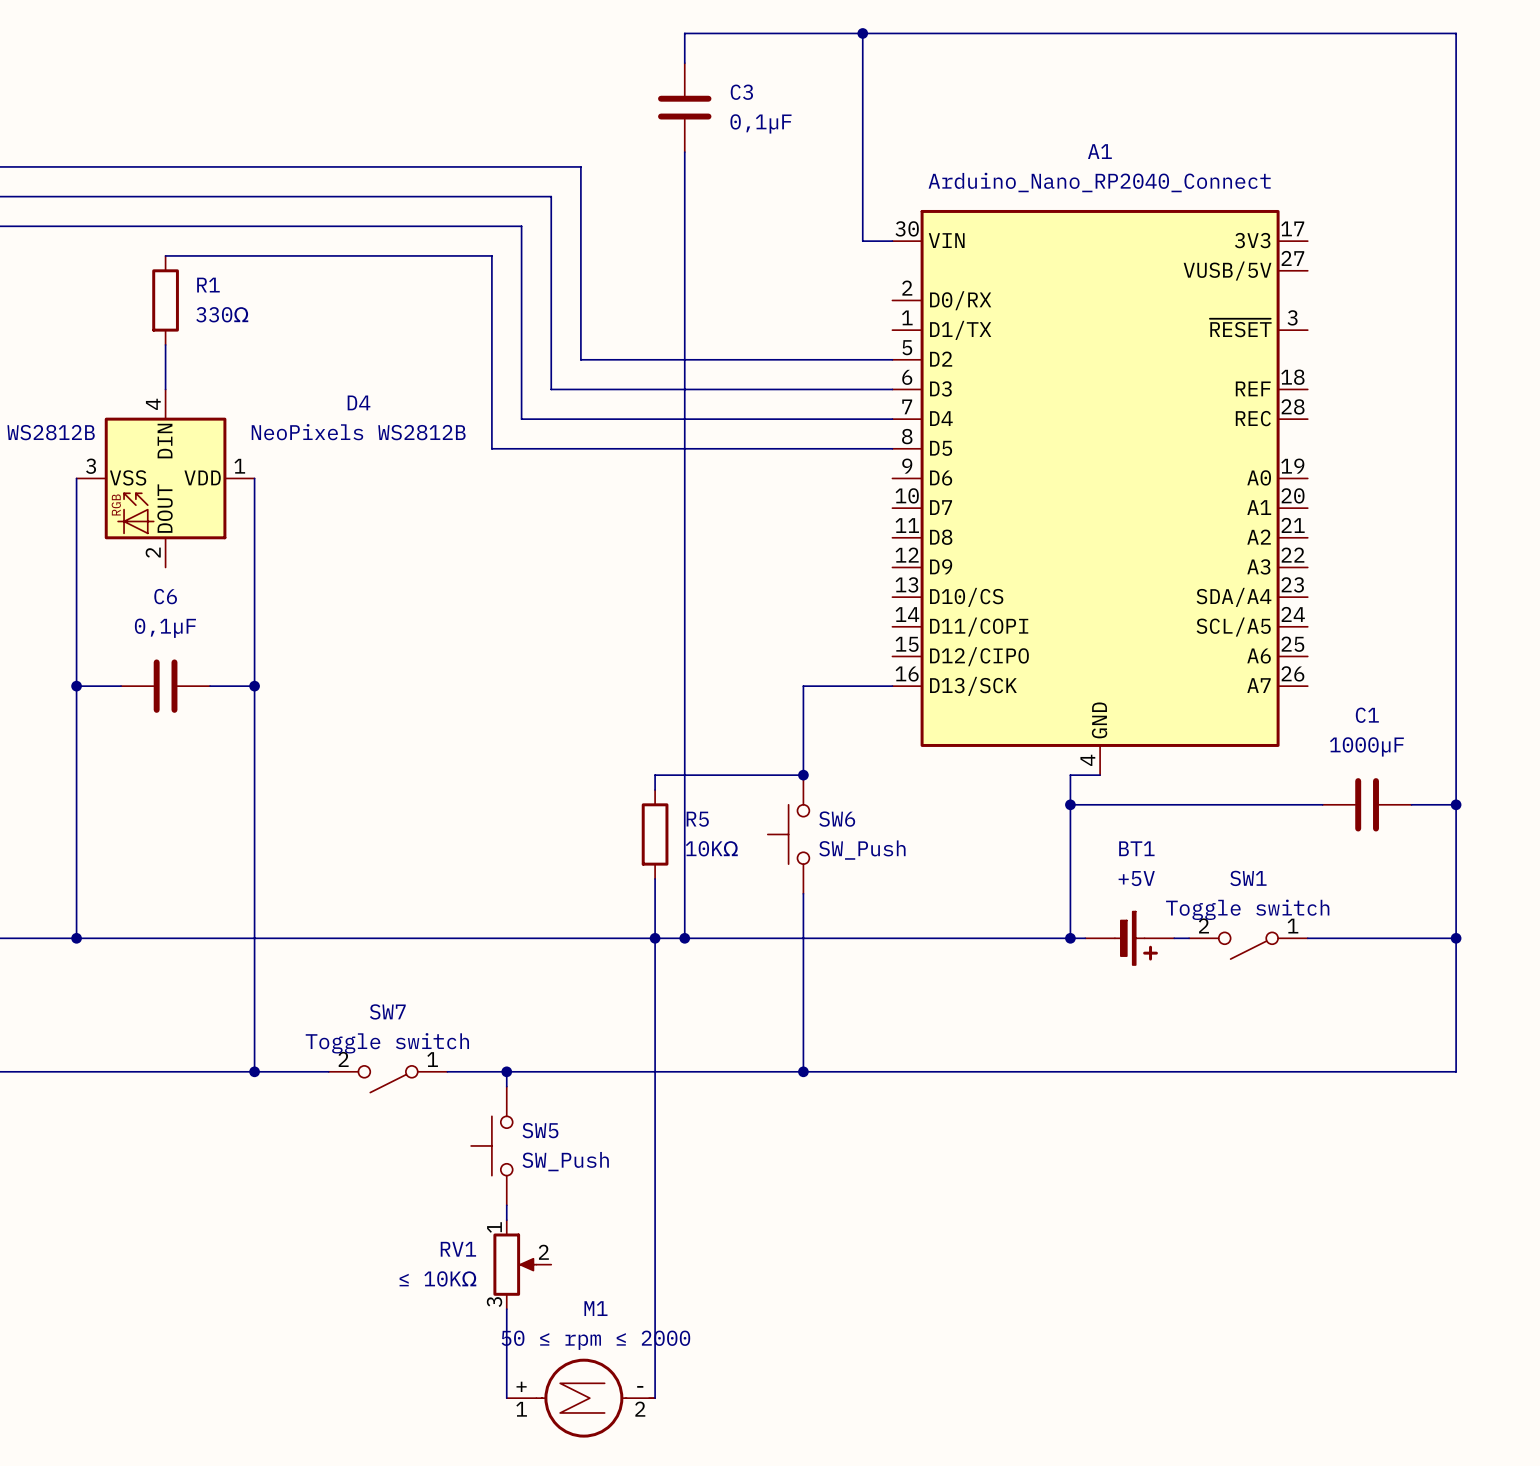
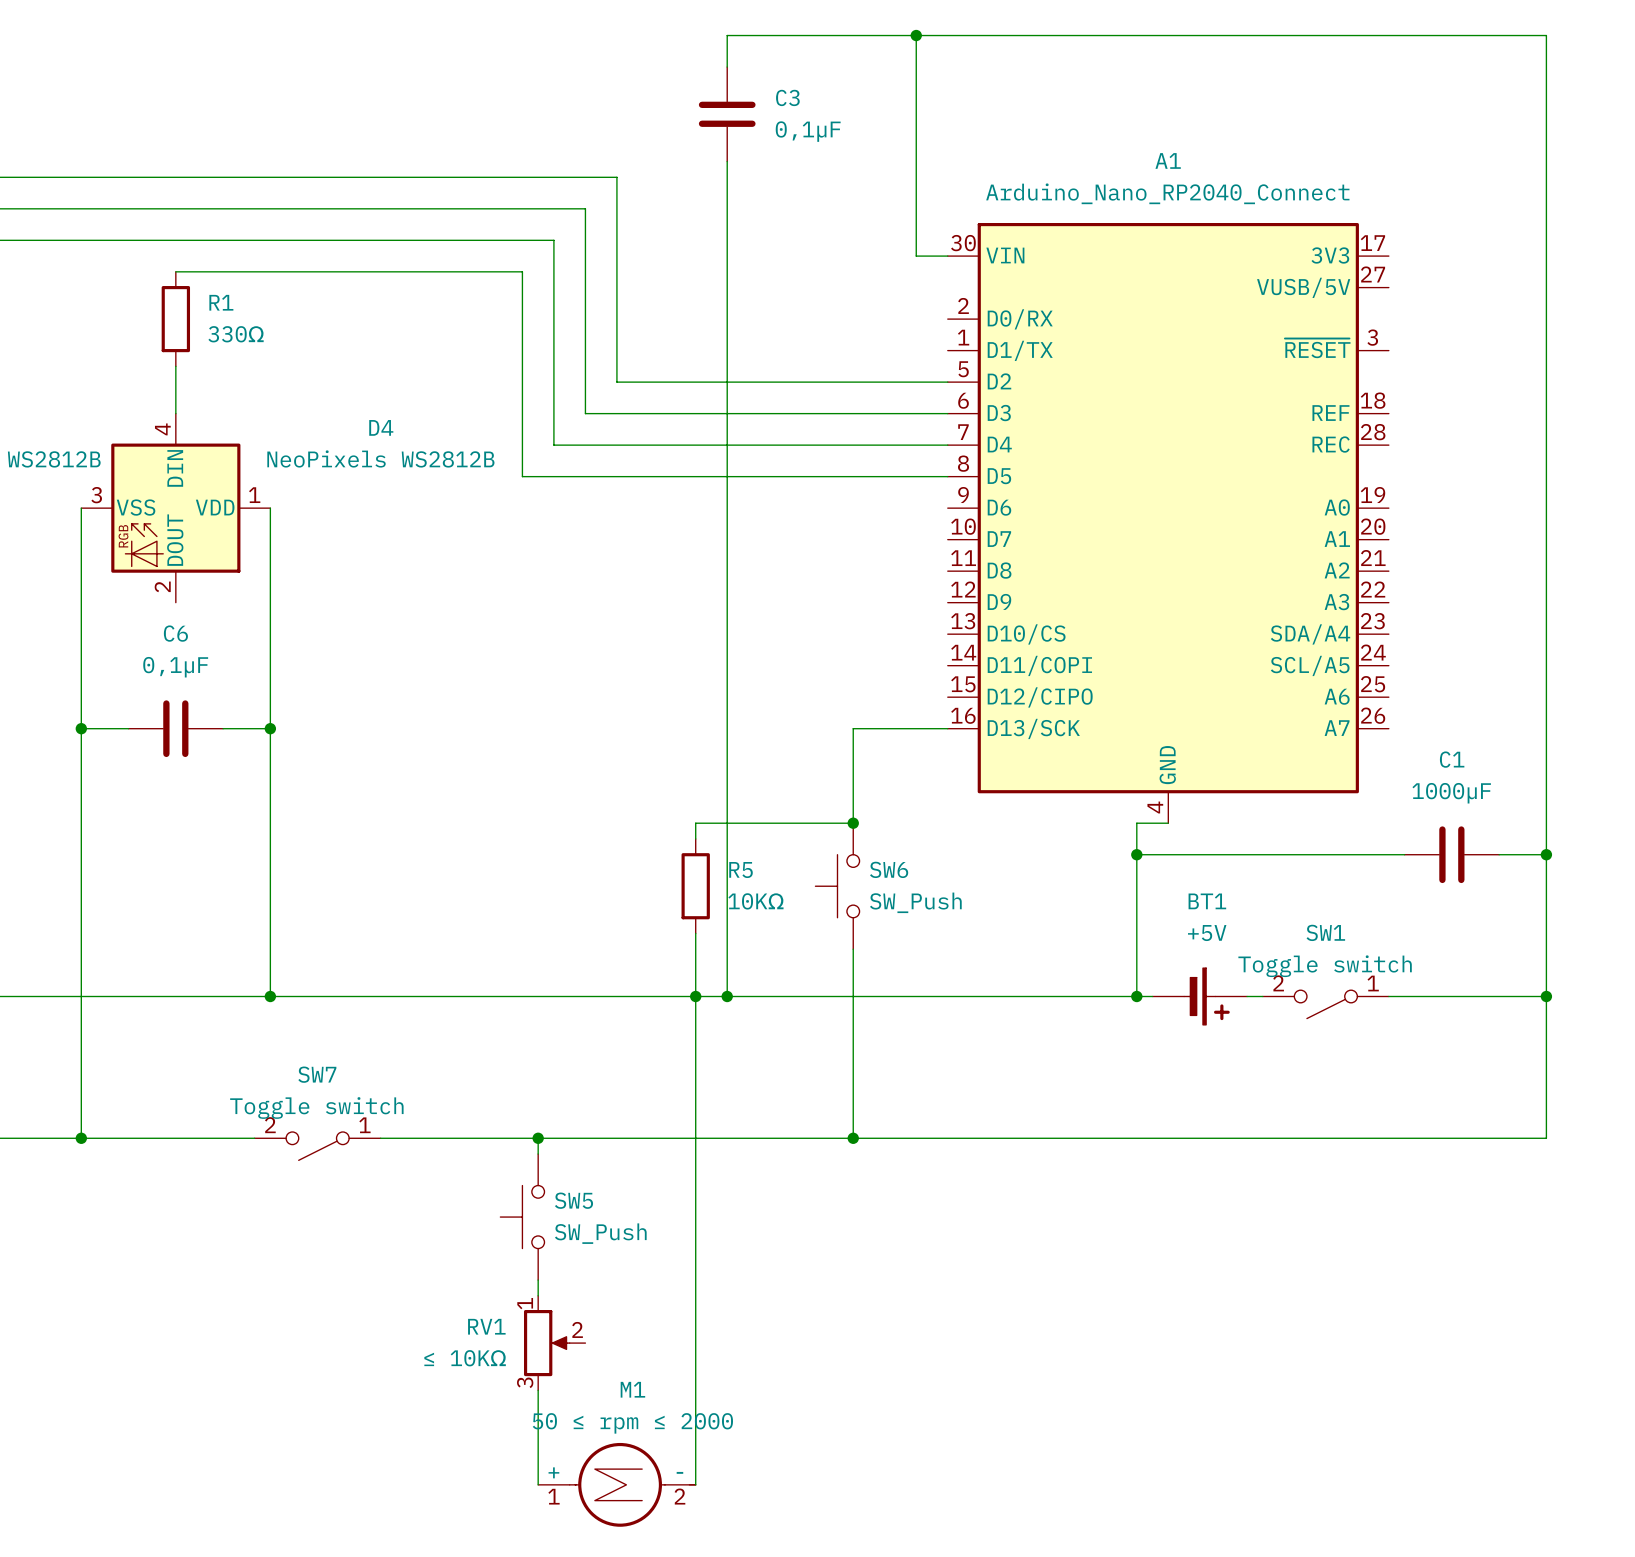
junction: (76, 938) -> none
wire: (254, 938) (254, 1071) -> (81, 996) (81, 1138)
junction: none -> (270, 996)
junction: none -> (81, 1138)
wire: (239, 1071) (328, 1071) -> (380, 1138) (475, 1138)
junction: (254, 1071) -> none
SW7 position: (388, 1079) -> (317, 1146)

